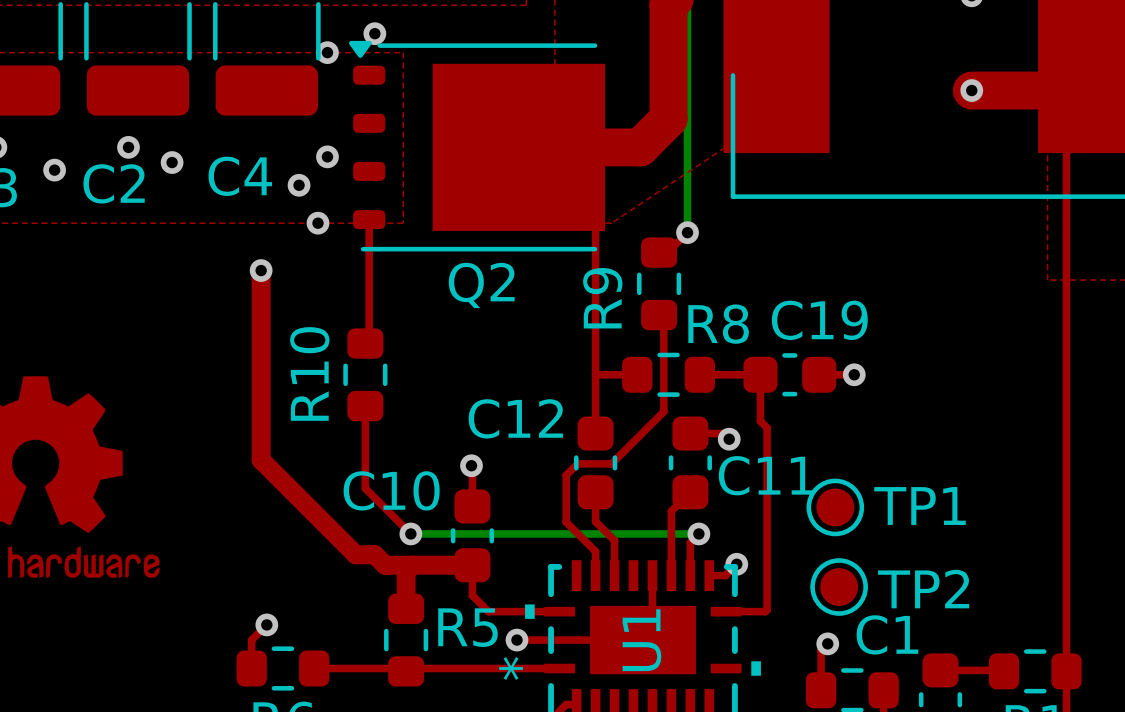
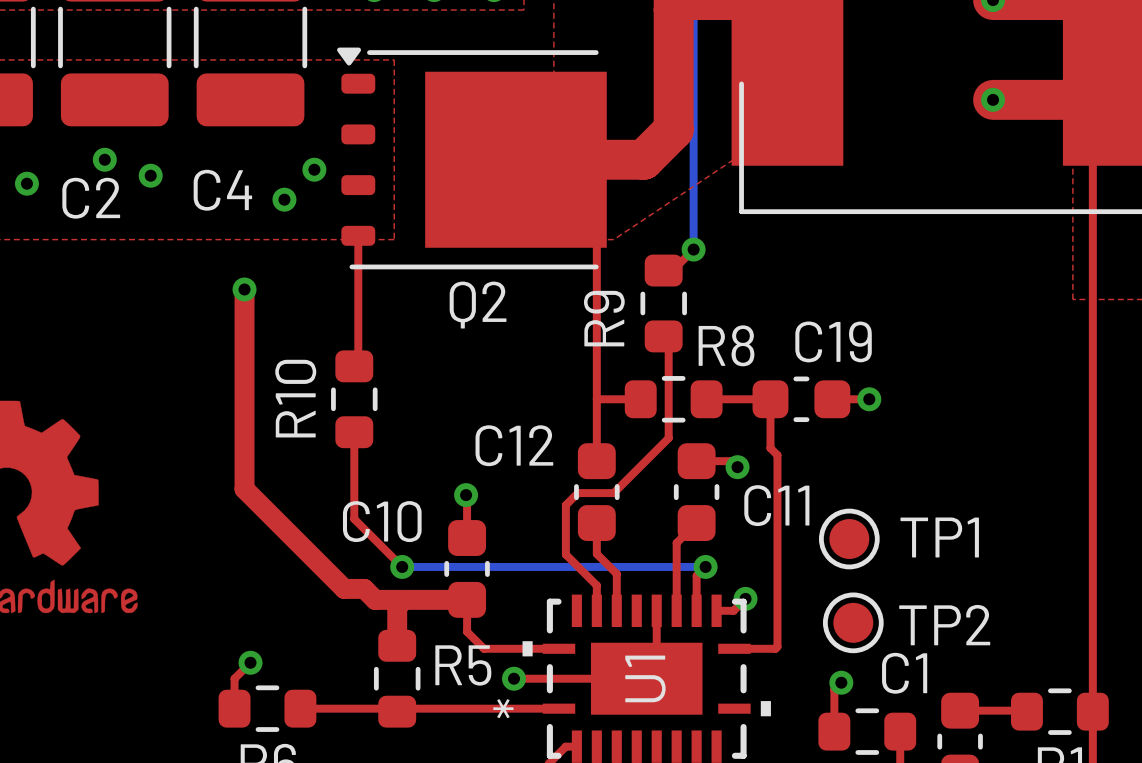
via: (374, 33) -> none
via: (327, 52) -> none
via: (318, 223) -> none

